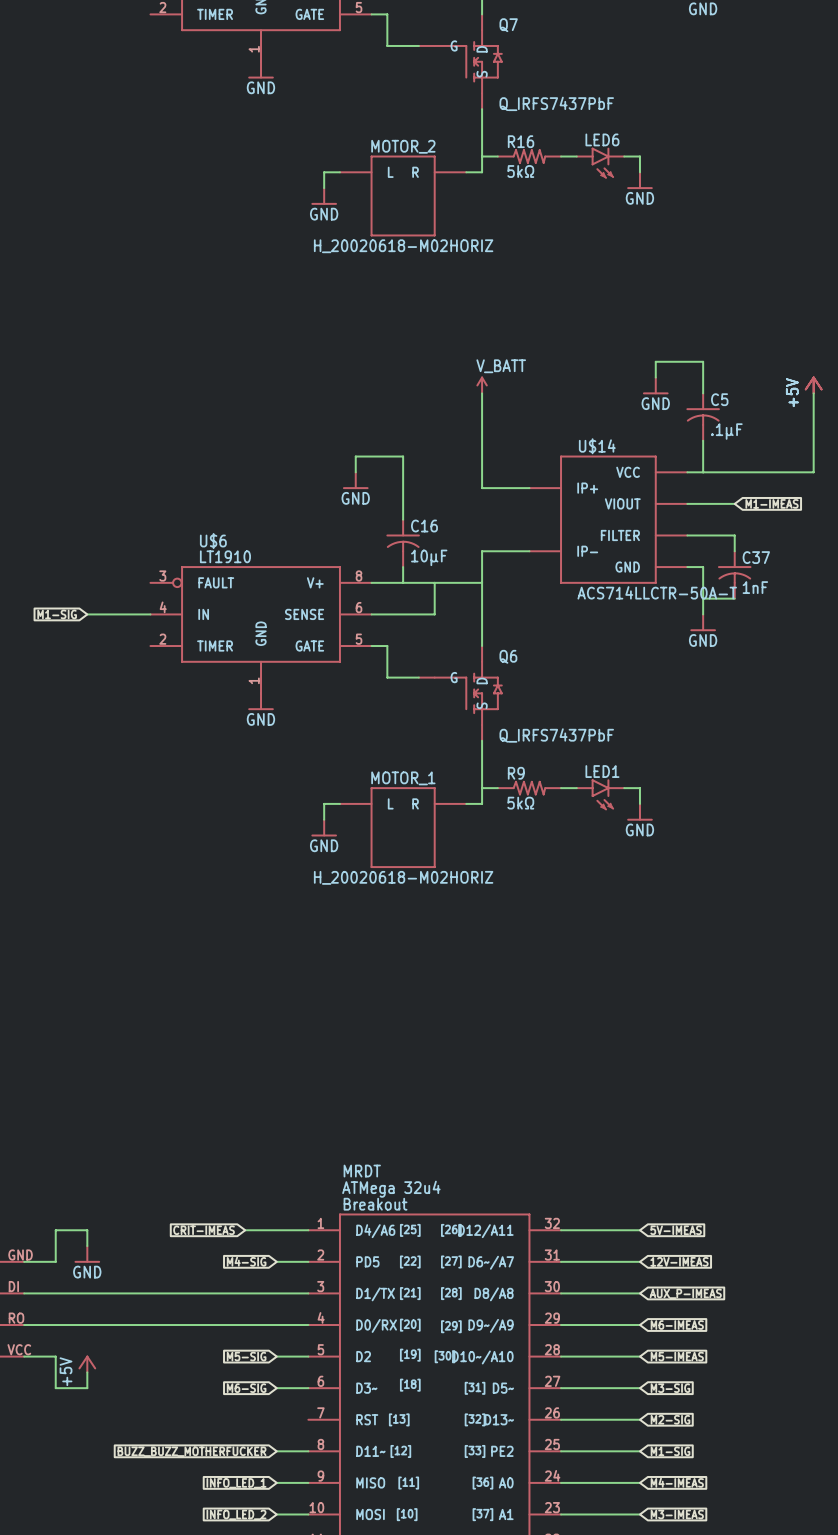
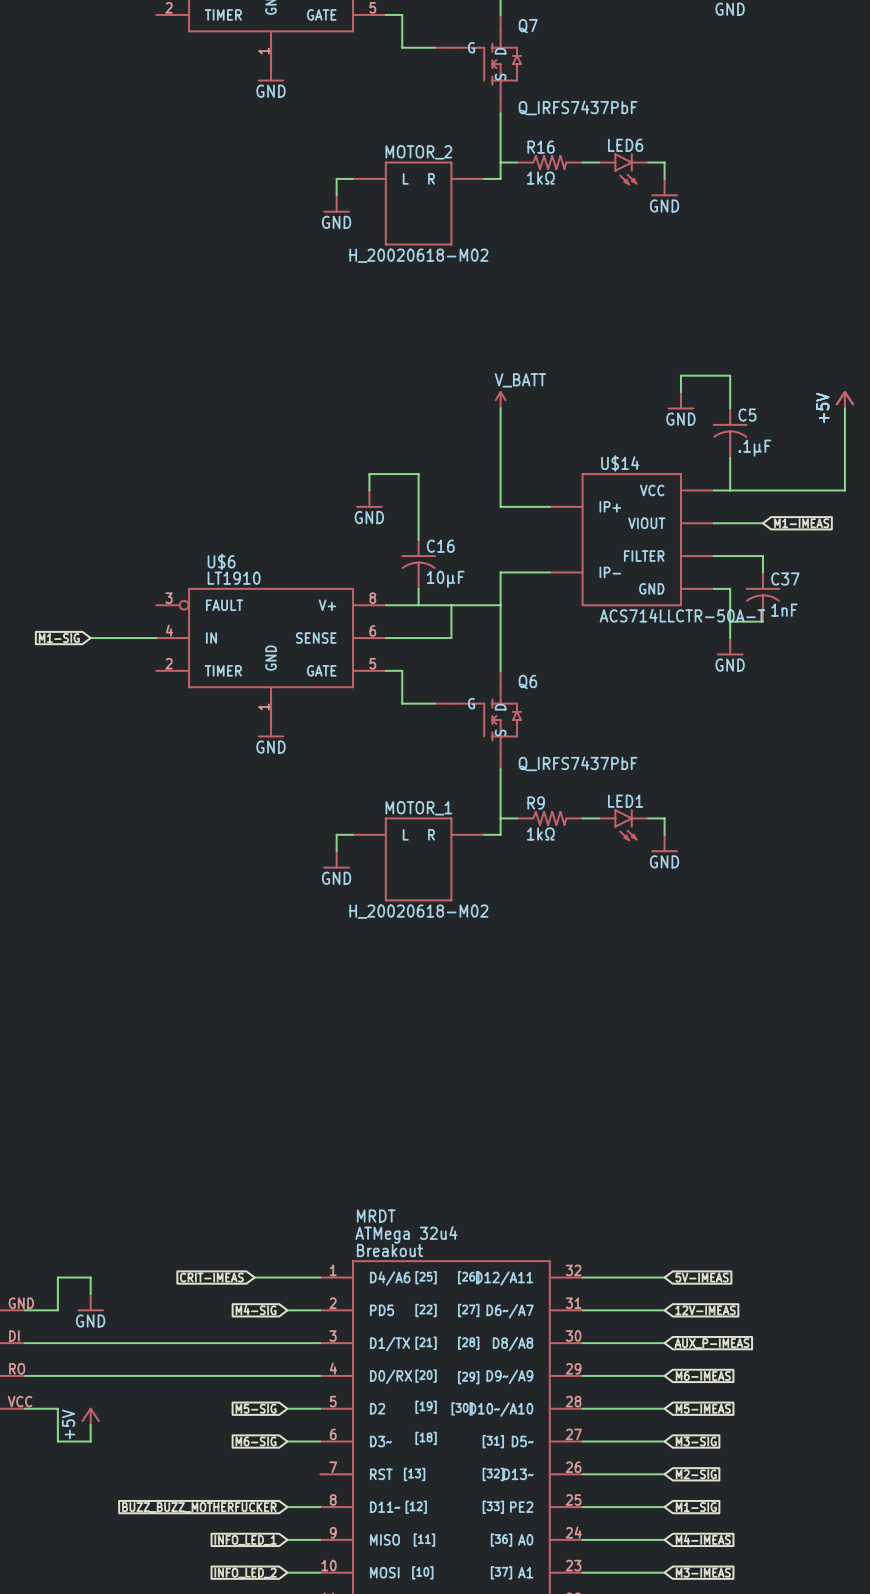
R16 value: 5kΩ (520, 171) -> 1kΩ (540, 178)
MOTOR_2 value: H_20020618-M02HORIZ (403, 246) -> H_20020618-M02 (418, 255)
R9 value: 5kΩ (520, 803) -> 1kΩ (540, 833)
MOTOR_1 value: H_20020618-M02HORIZ (403, 877) -> H_20020618-M02 (418, 911)

